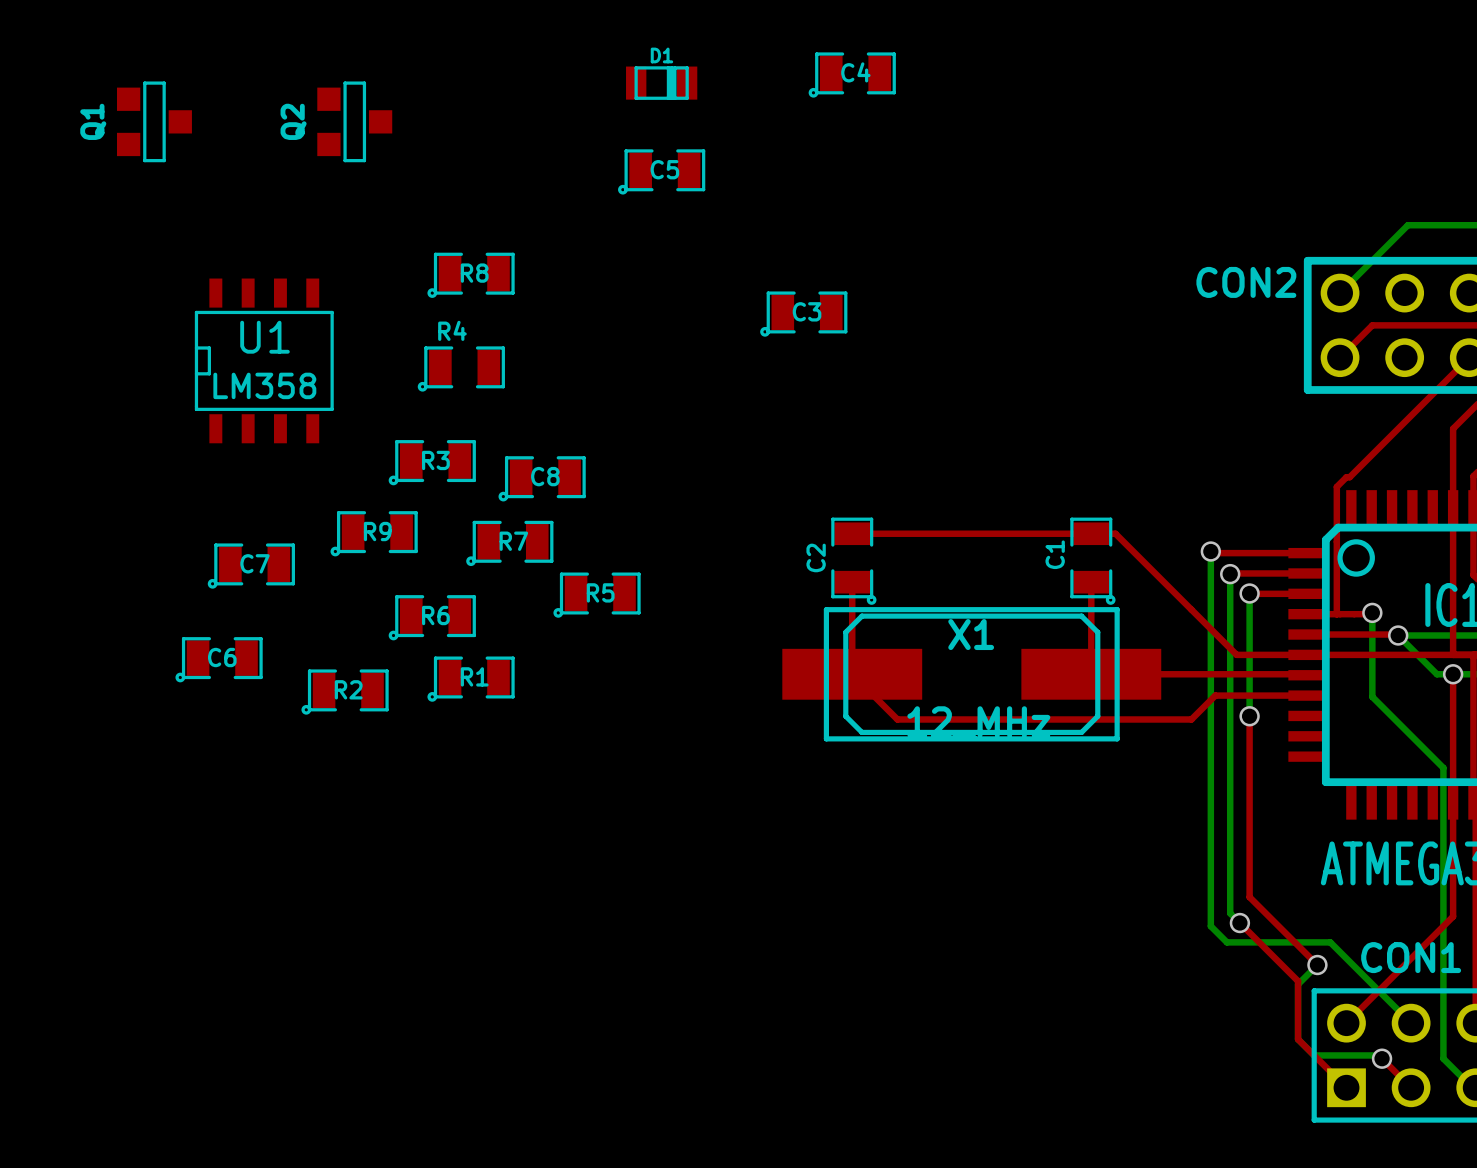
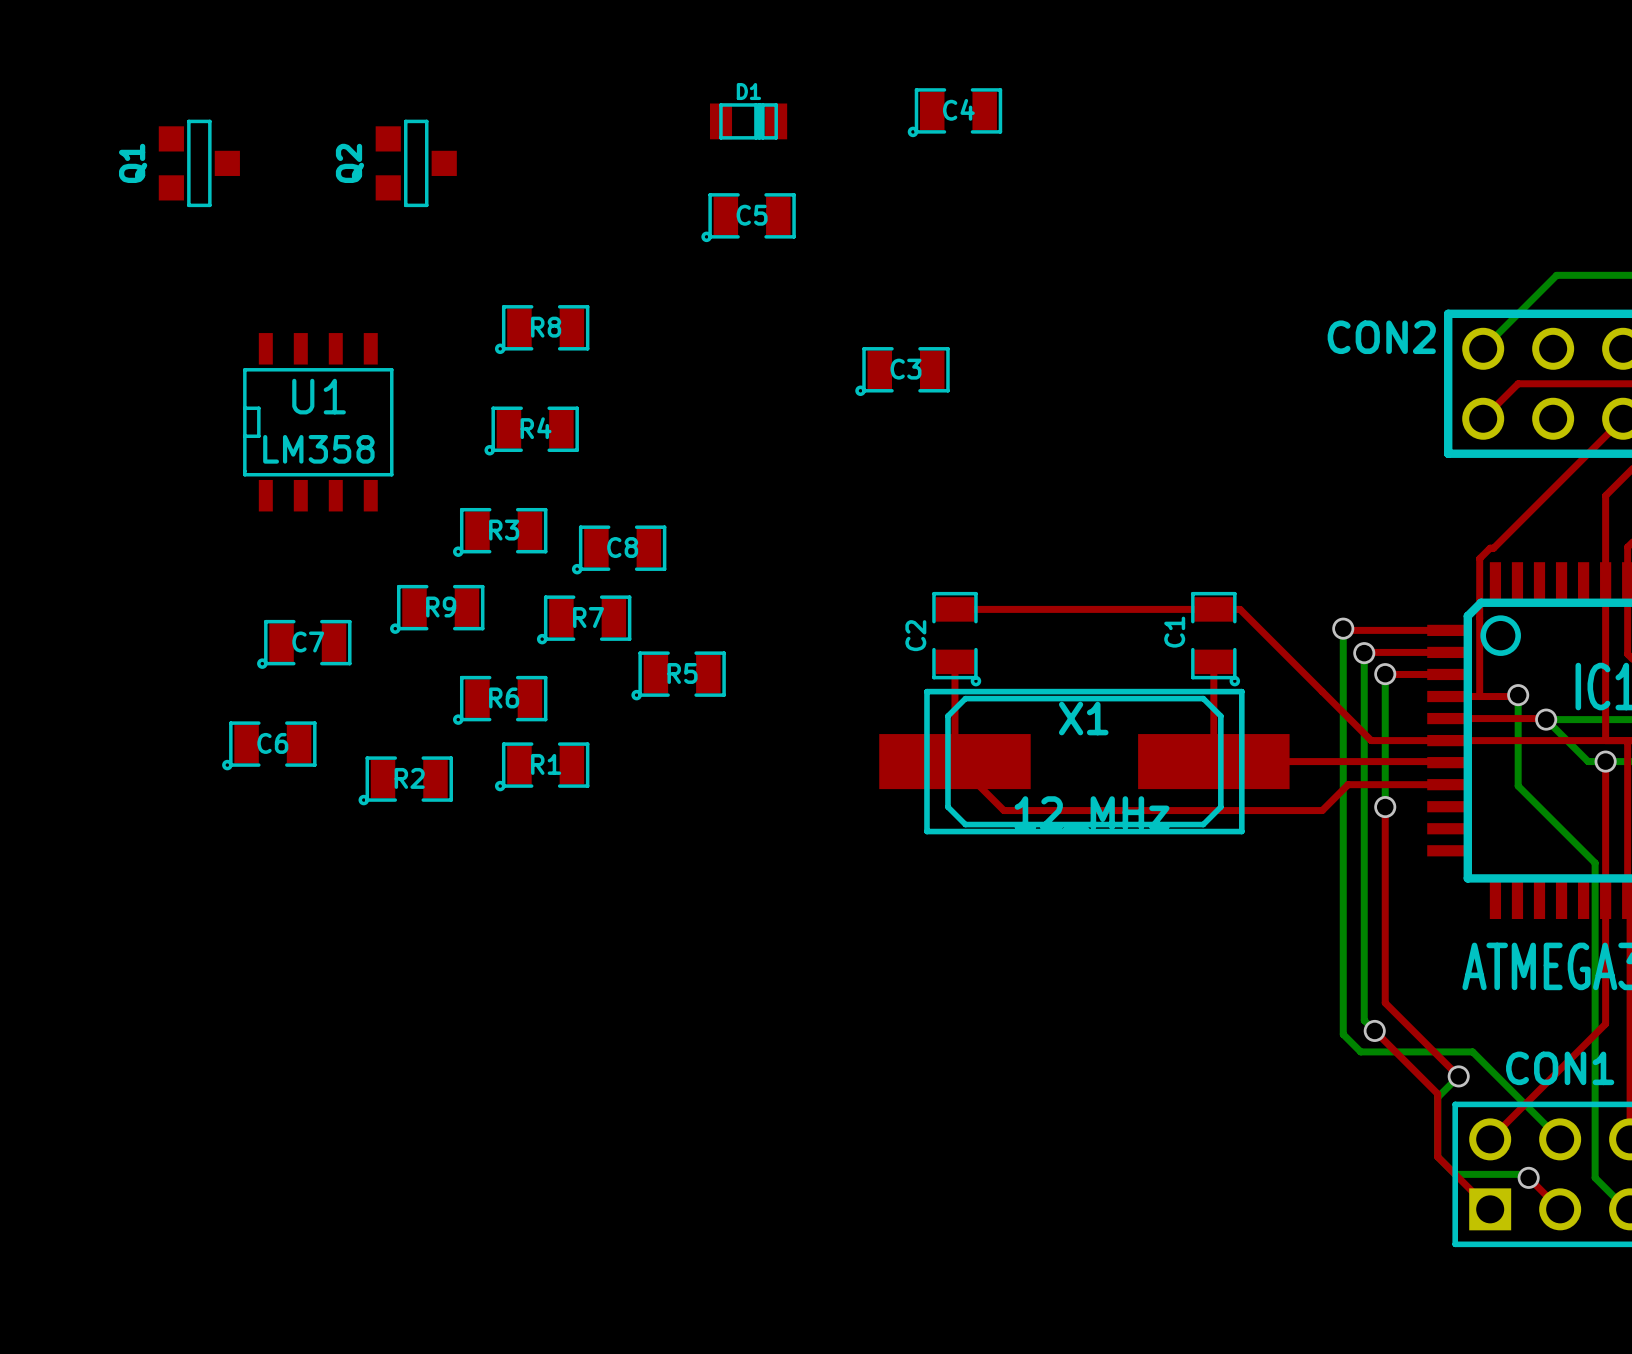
R4 name position: R4 (452, 330) -> R4 (536, 428)

